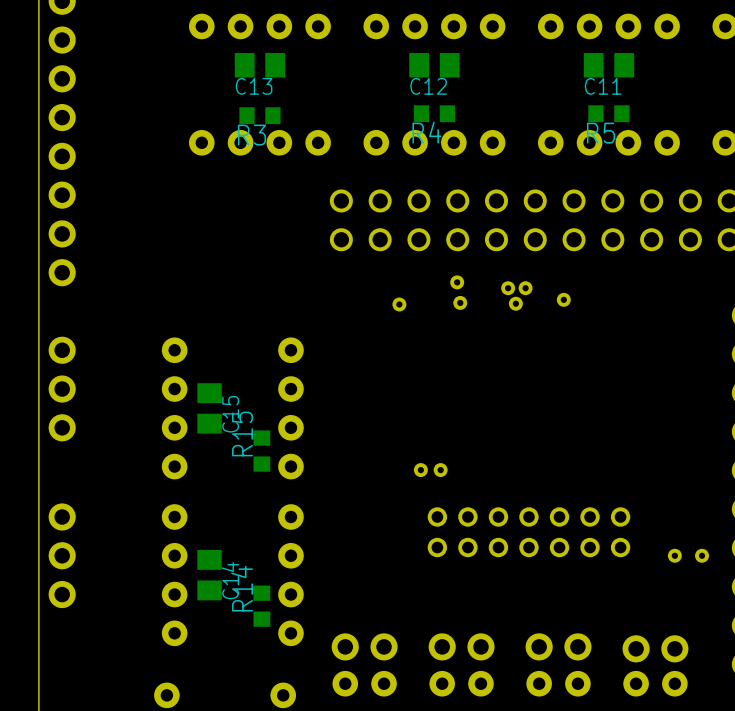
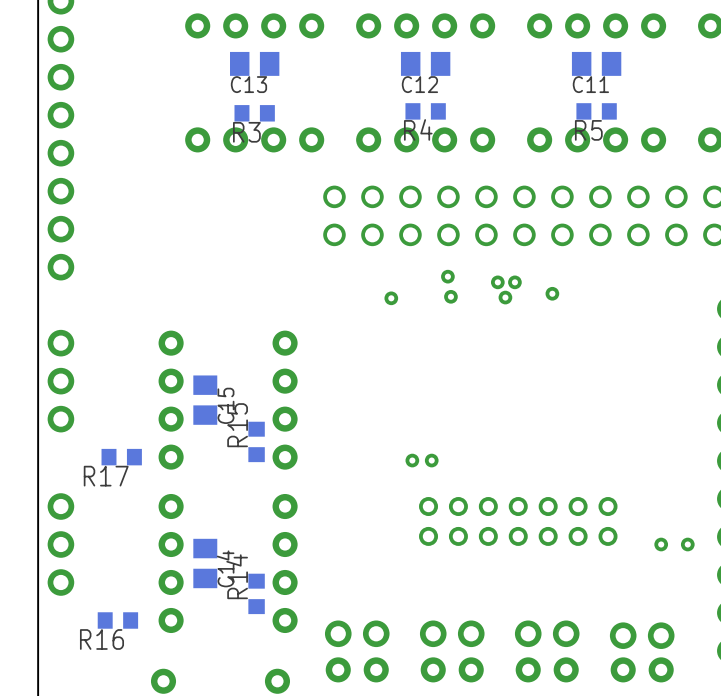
R17: none -> (121, 457)
R16: none -> (117, 620)

